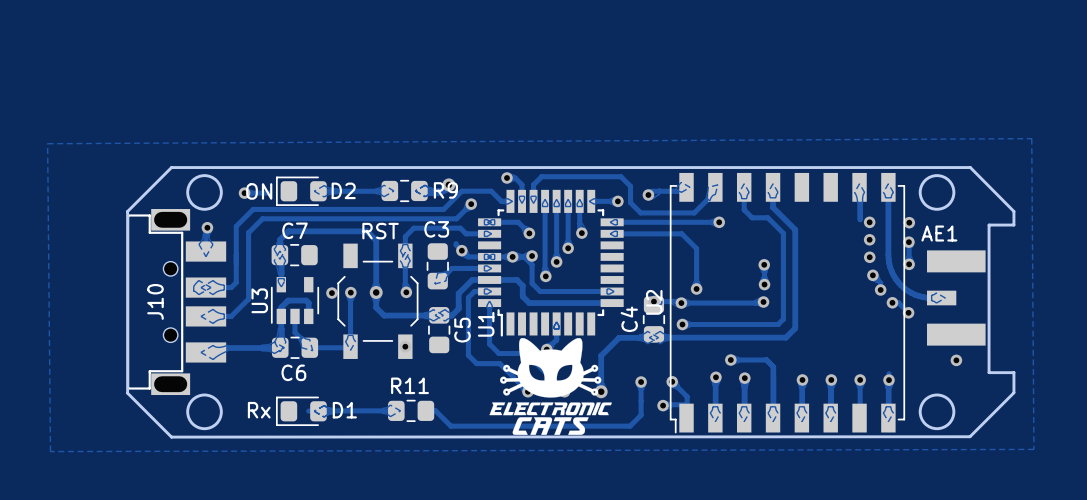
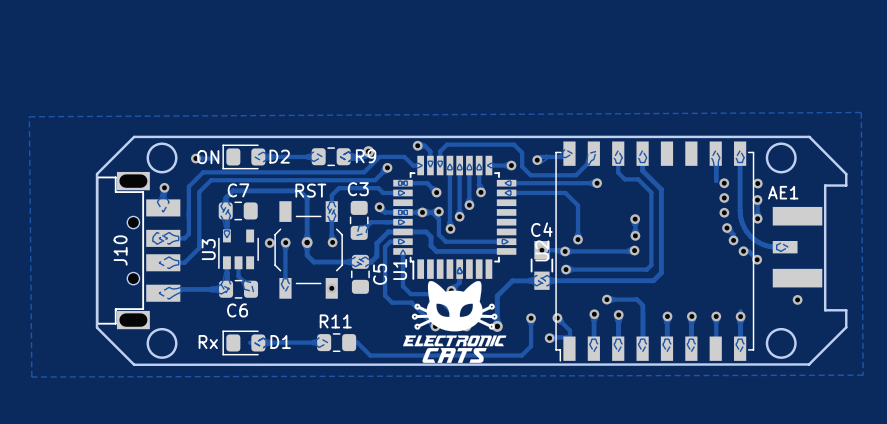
track: (456, 243) (461, 250) -> none
C4 footprint: [642, 296, 666, 343] -> [530, 241, 554, 290]
track: (281, 316) (281, 307) (288, 300) (306, 300) (308, 303) (308, 316) -> none
C4 name rotation: 0° (629, 319) -> 90° clockwise (541, 229)
C4 name position: C4 (629, 319) -> C4 (541, 229)
track: (350, 346) (309, 347) -> none

